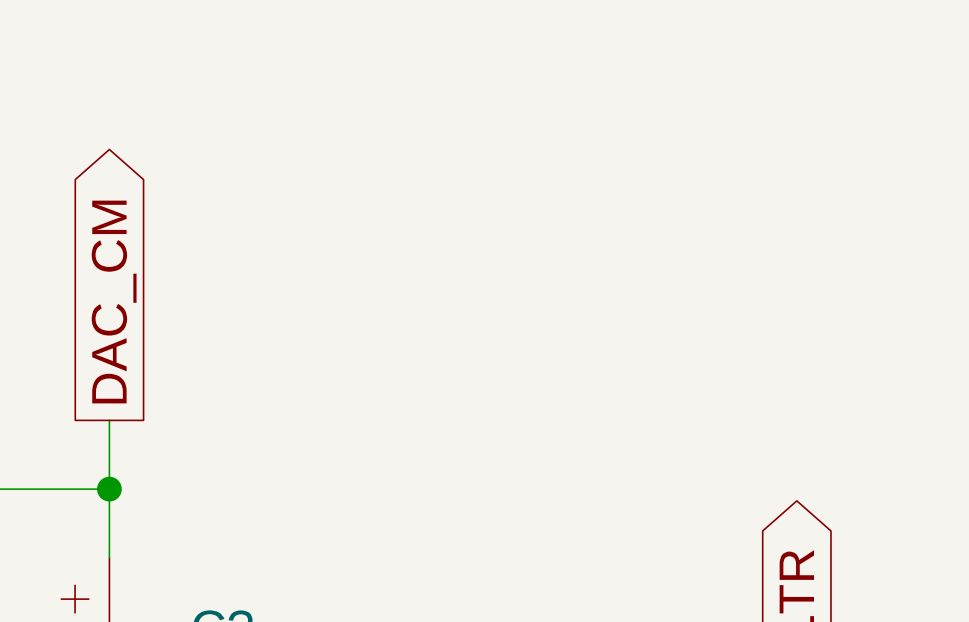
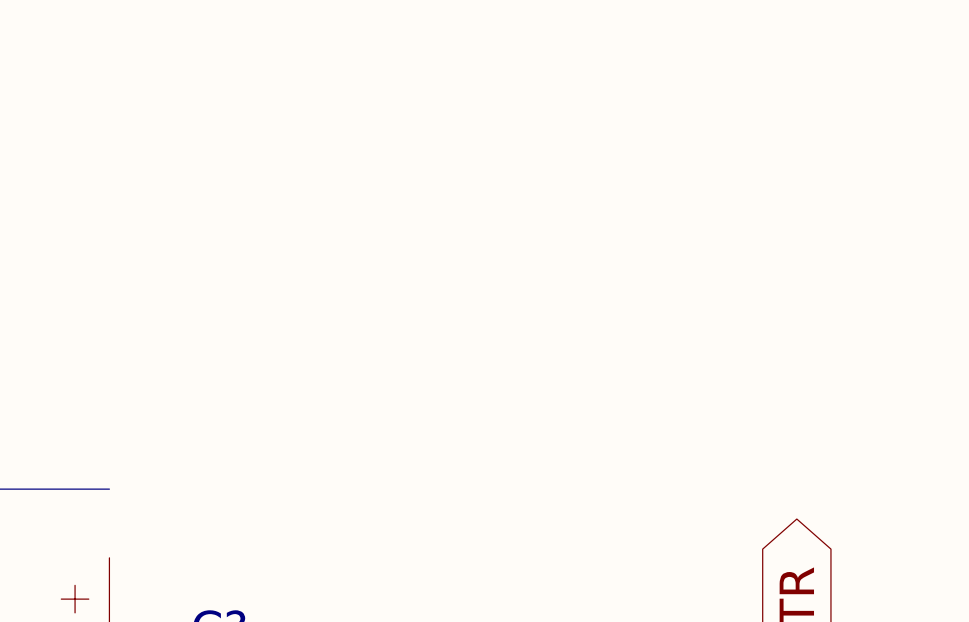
global label: DAC_CM (114, 302) -> none
wire: (109, 420) (109, 557) -> none
junction: (109, 489) -> none

